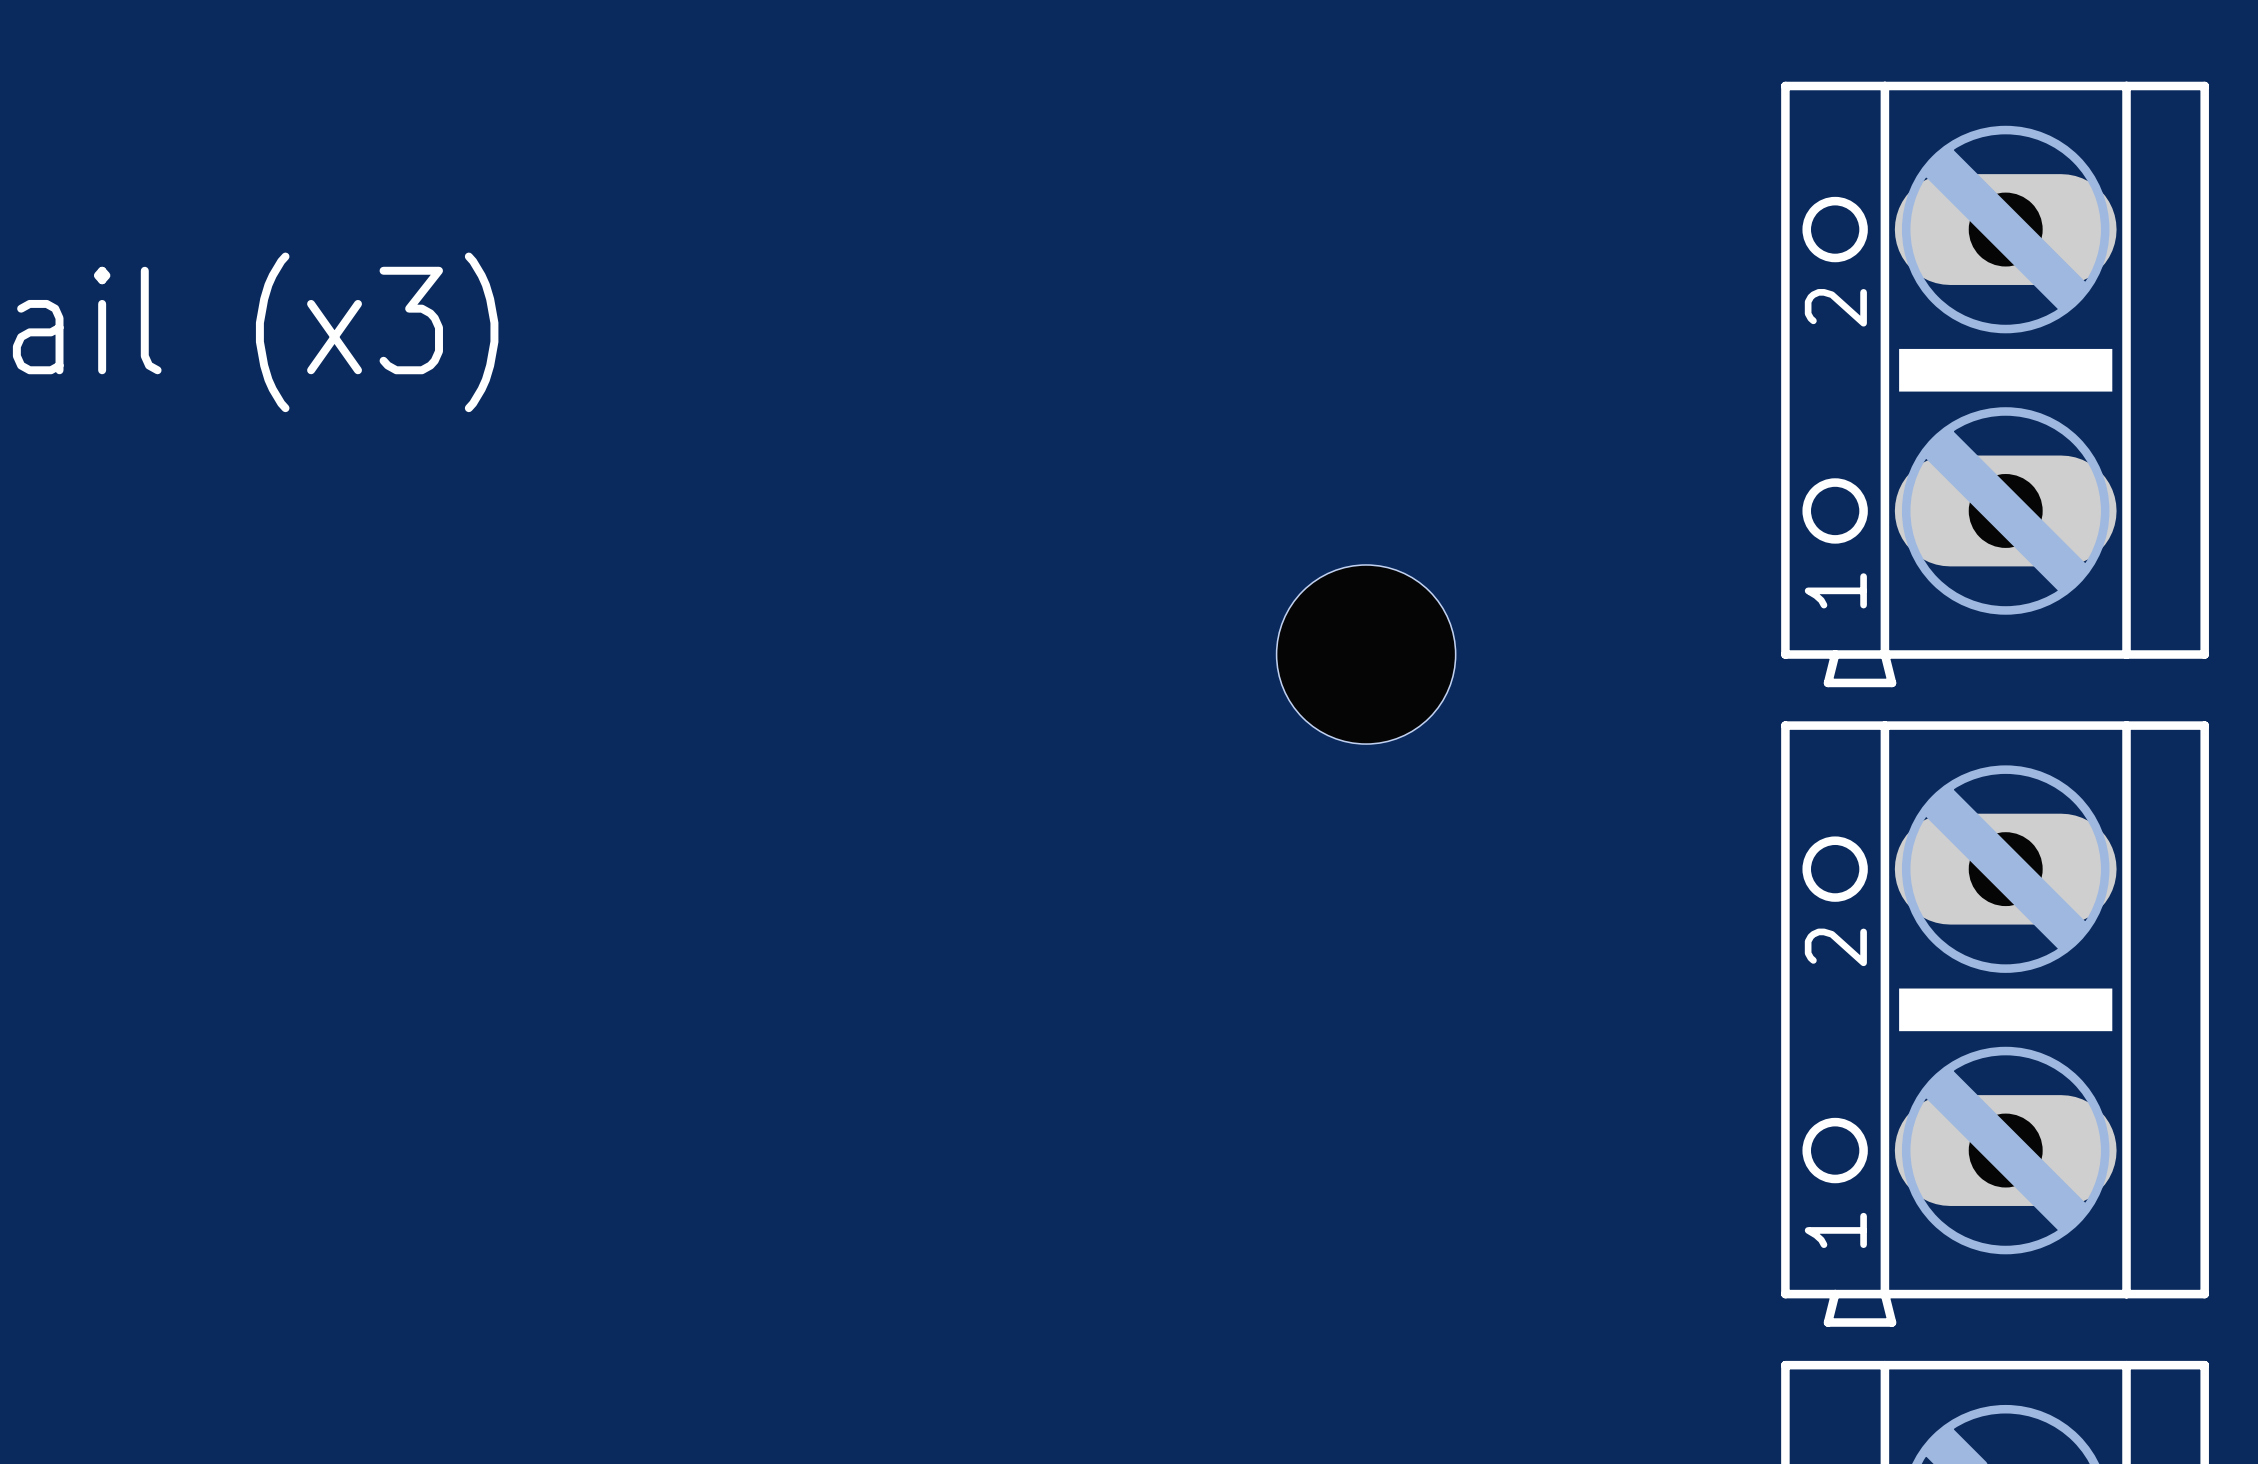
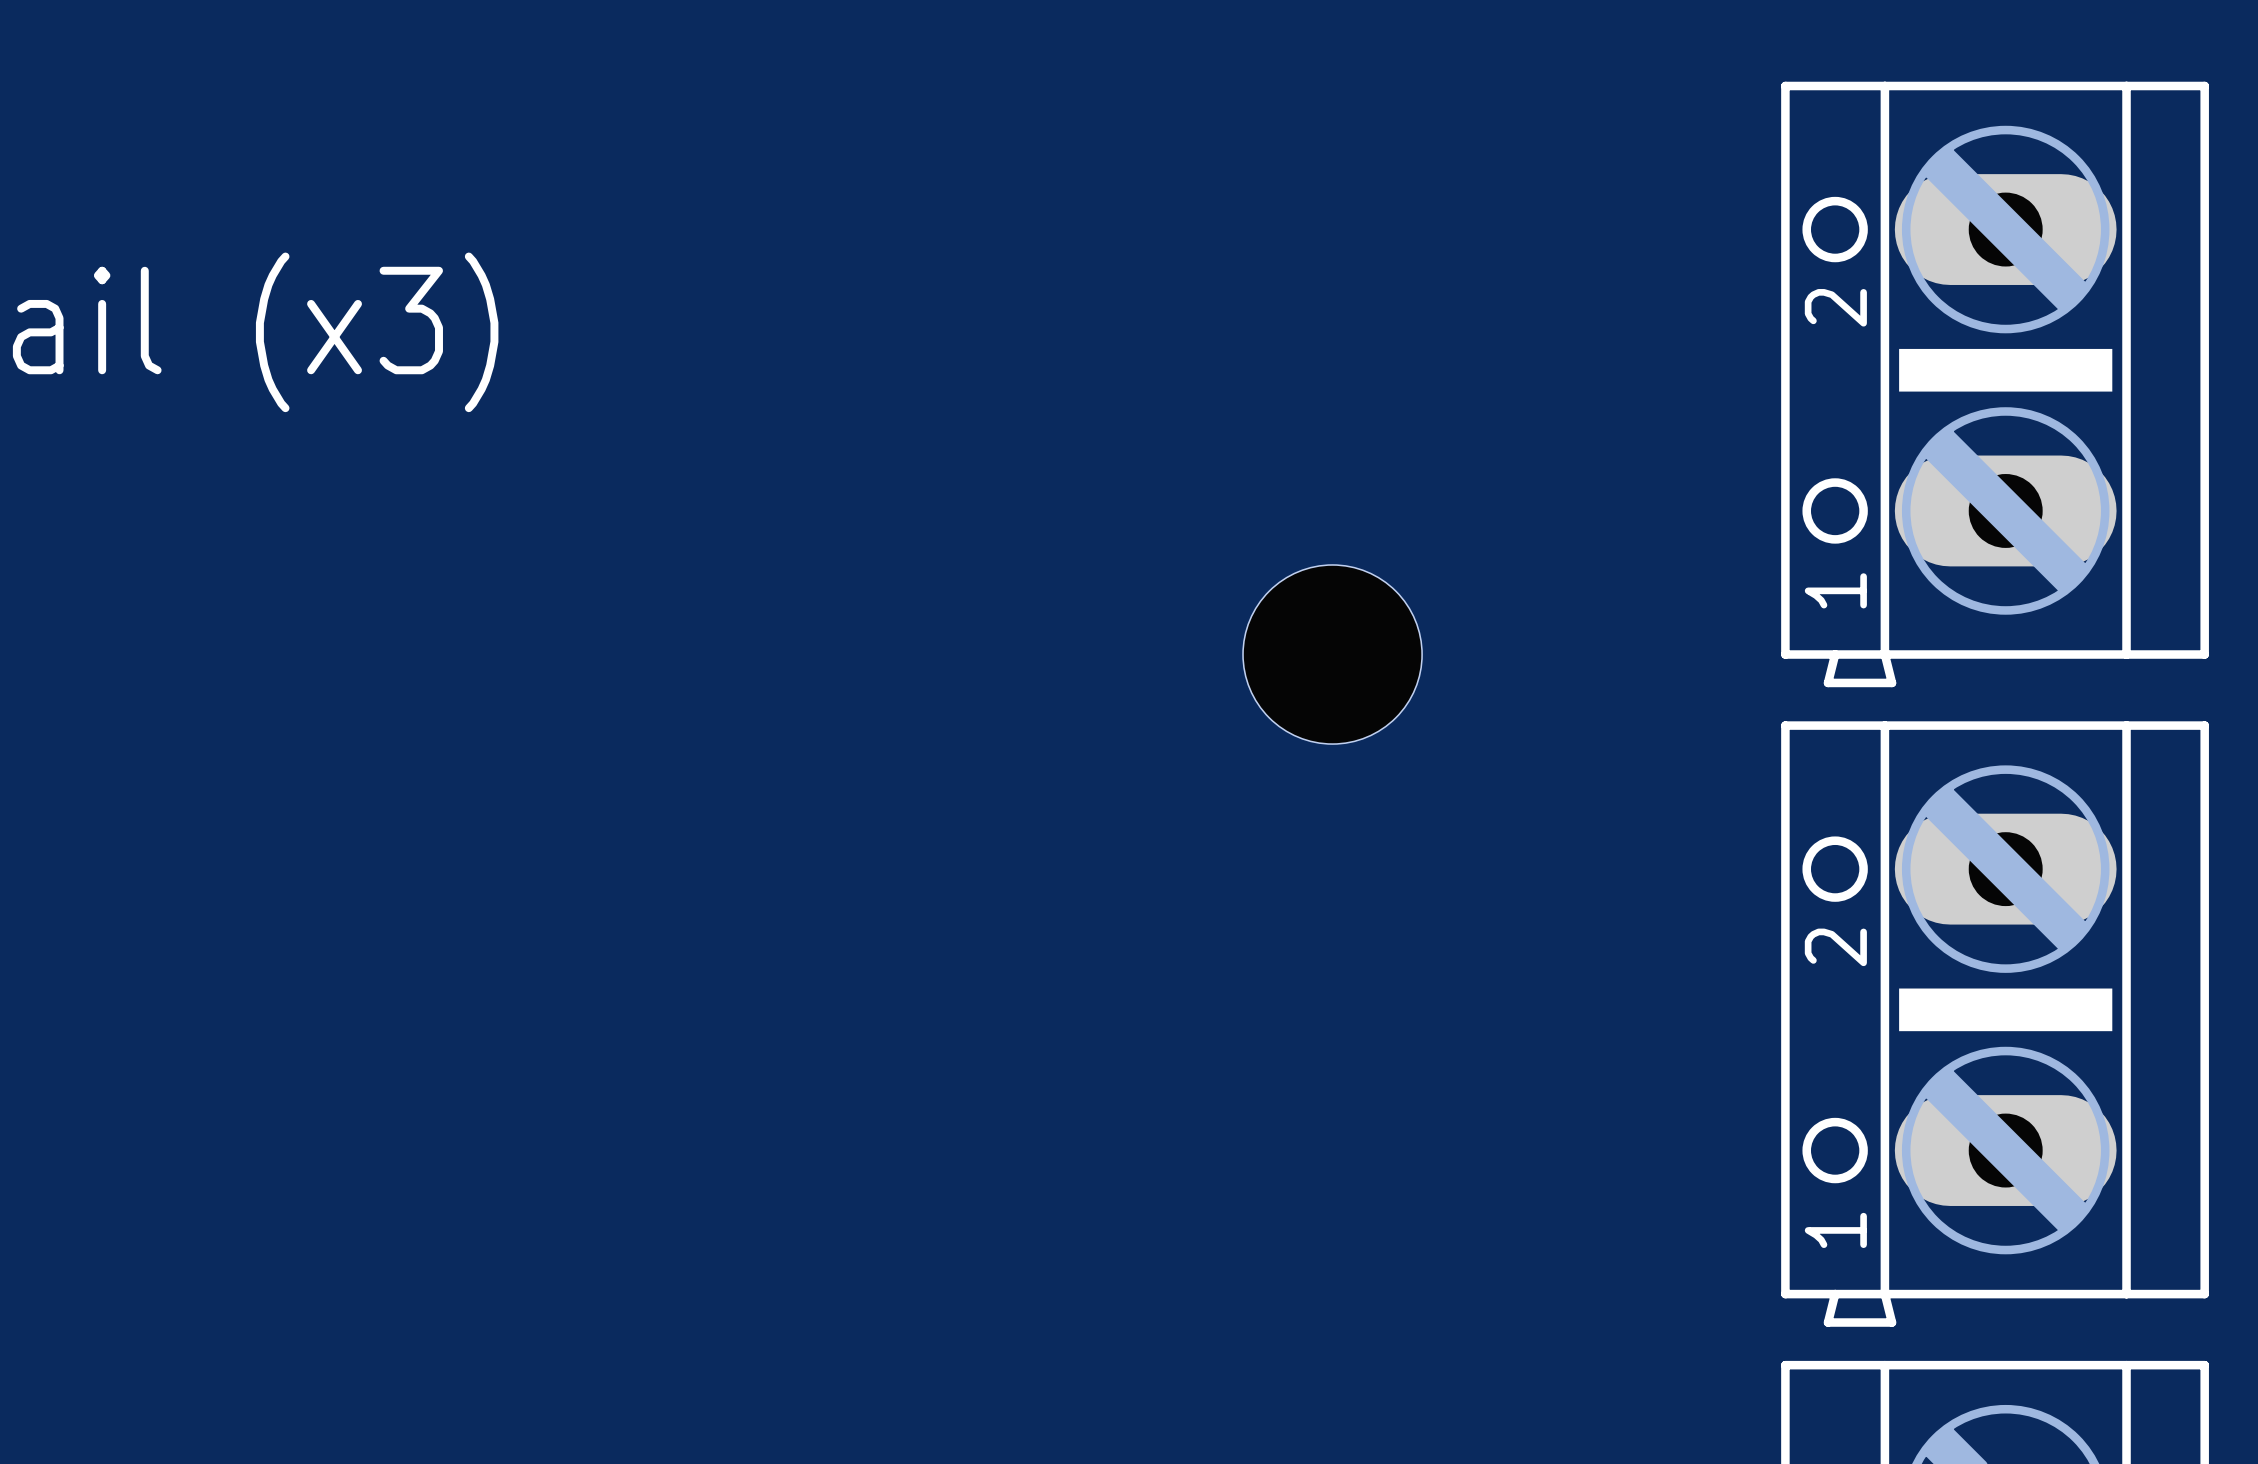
hole position: (1366, 654) -> (1332, 654)

